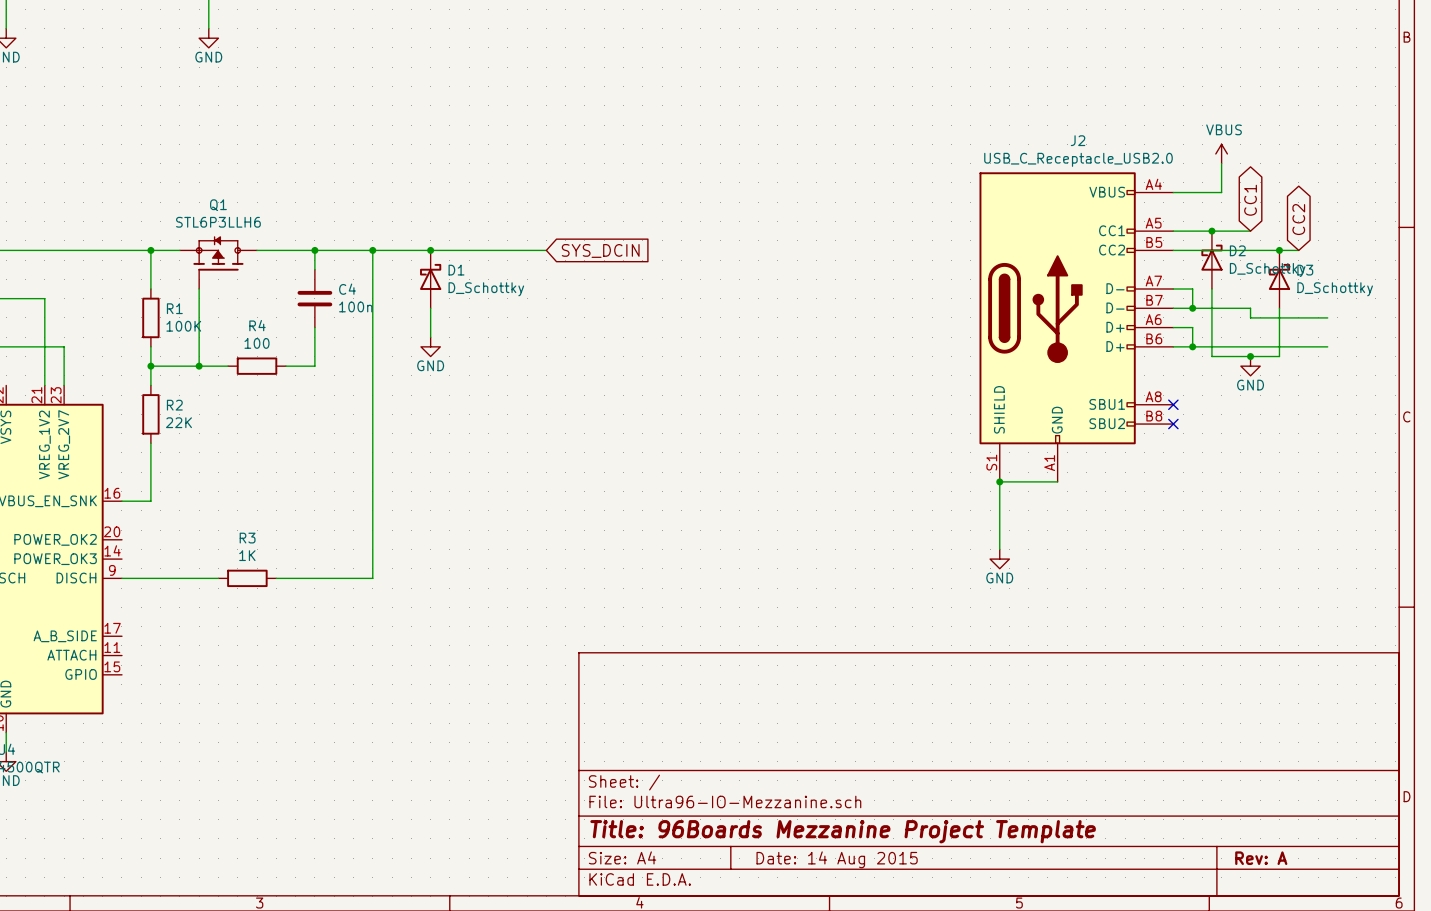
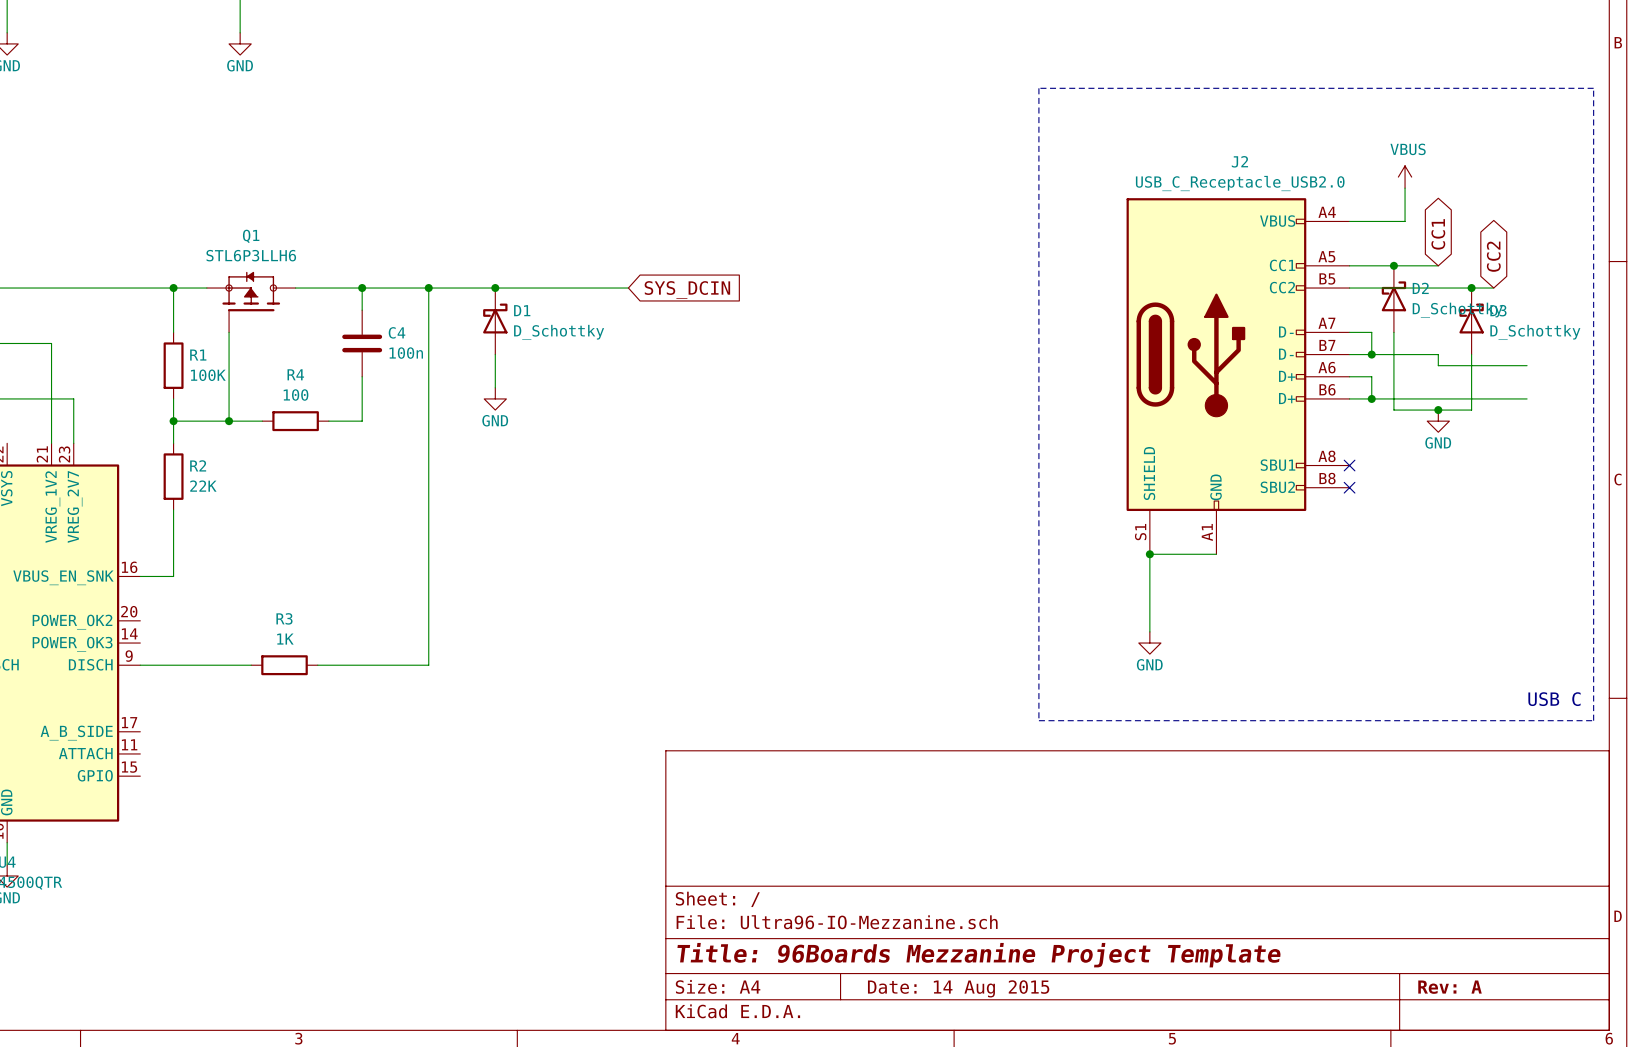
line: none -> (1038, 88) (1038, 720) (1593, 720) (1593, 88) (1038, 88)
text: none -> USB C (1554, 699)

